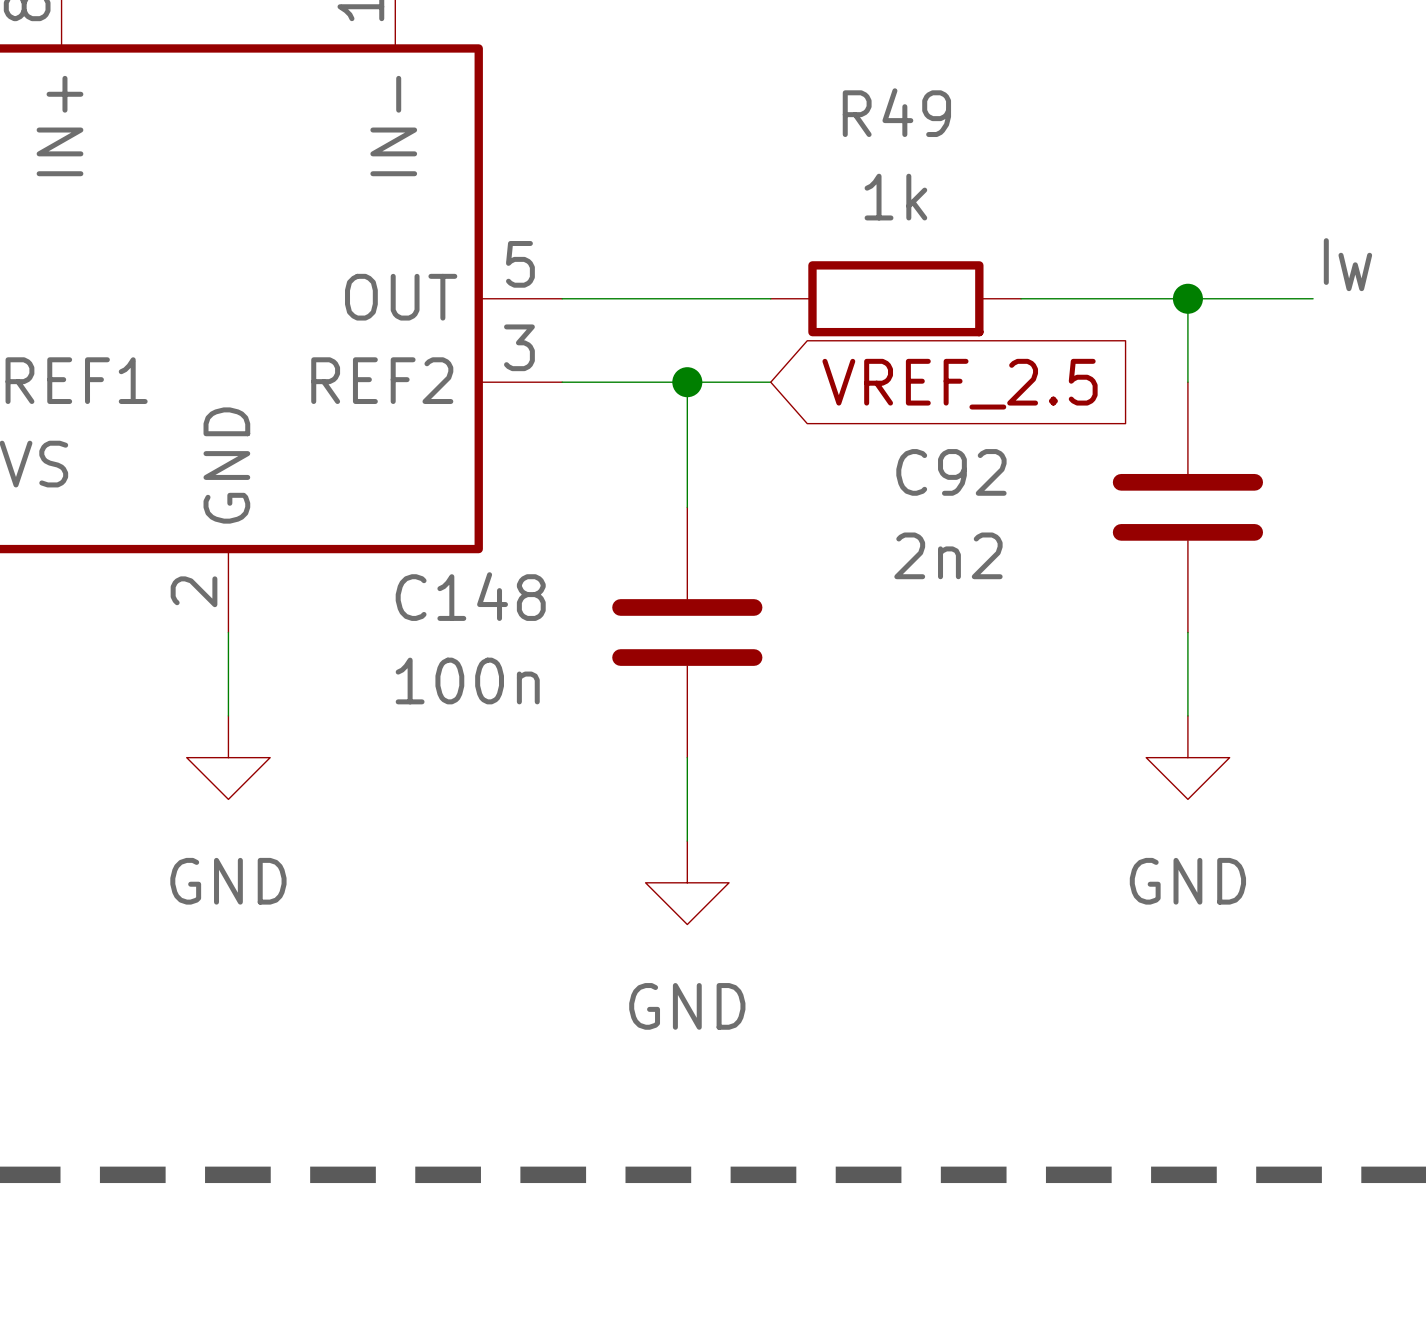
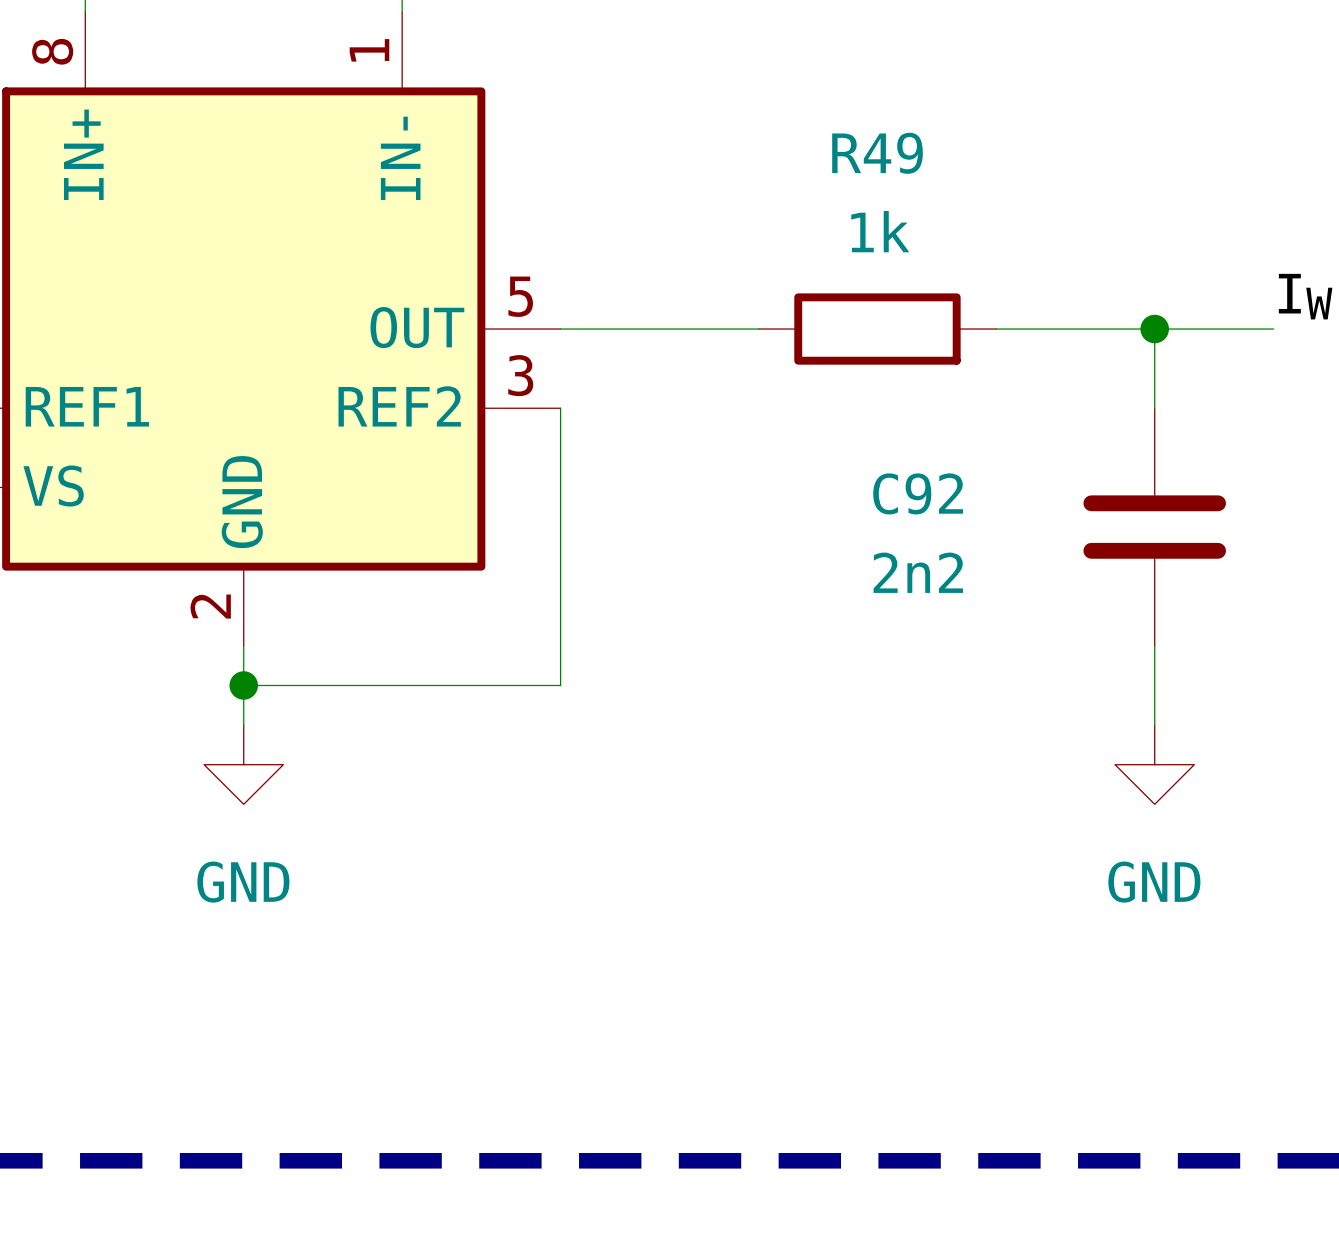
wire: (562, 382) (770, 382) -> (560, 408) (560, 685) (243, 685)
wire: (687, 382) (687, 507) -> none
junction: (687, 382) -> none
global label: VREF_2.5 (960, 384) -> none
C148: 100n (687, 632) -> none
junction: none -> (243, 685)
wire: (687, 757) (687, 841) -> none
power symbol: GND (687, 882) -> none

